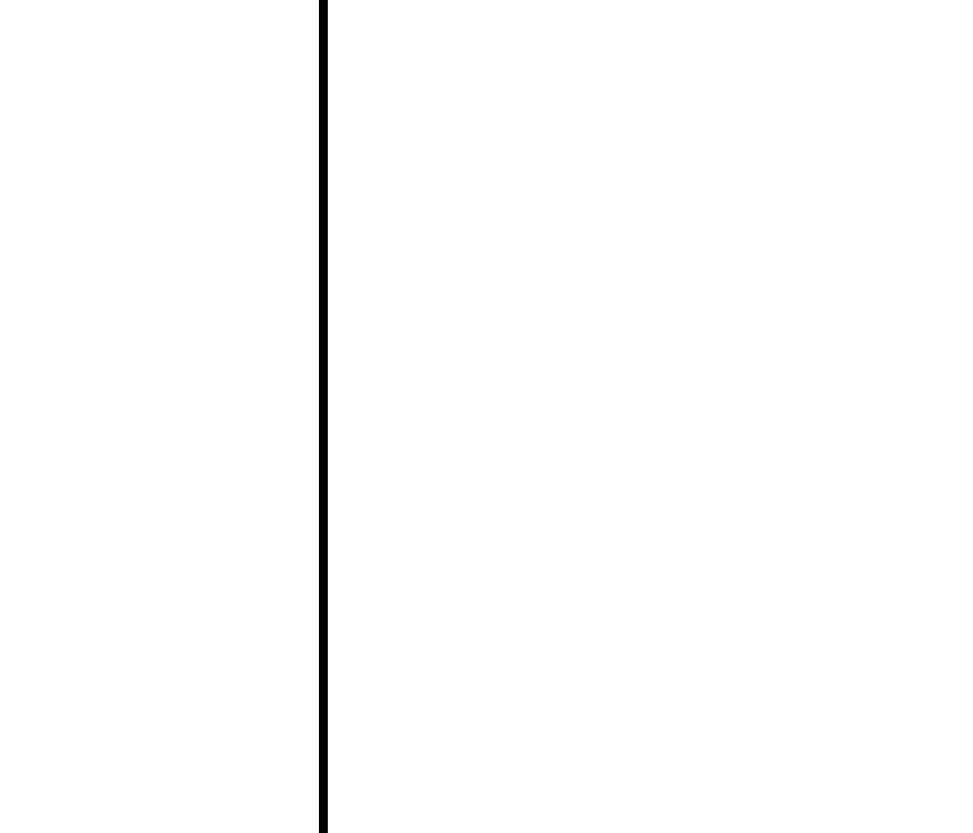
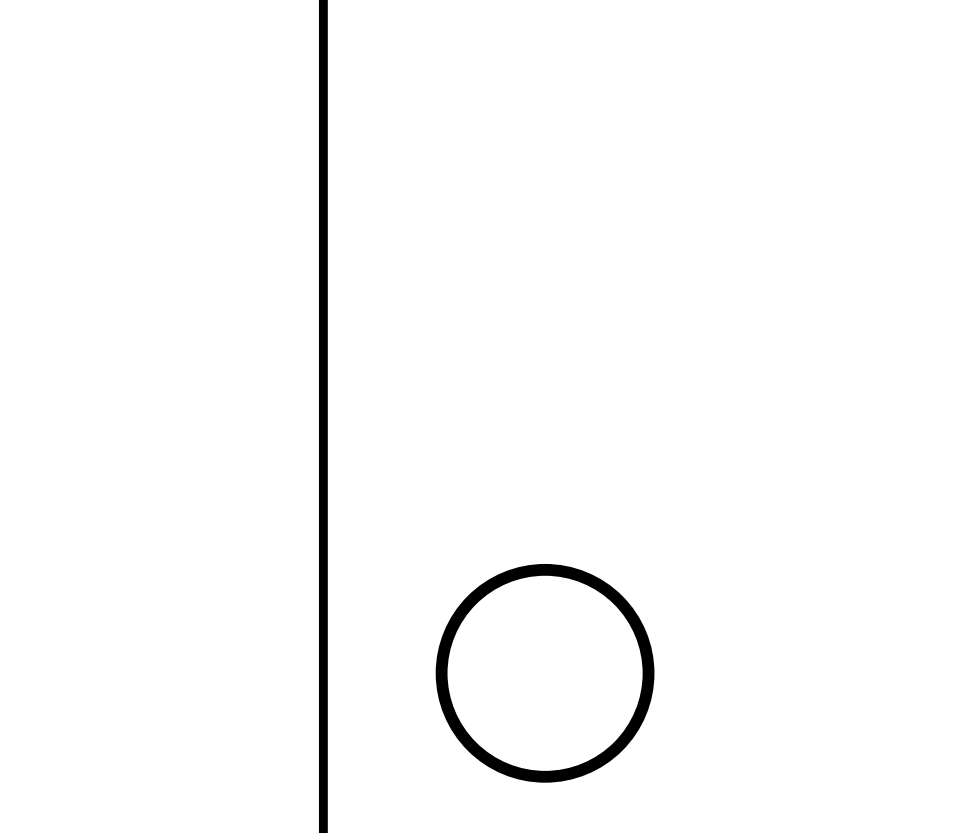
round board edge: none -> [435, 563, 655, 783]

